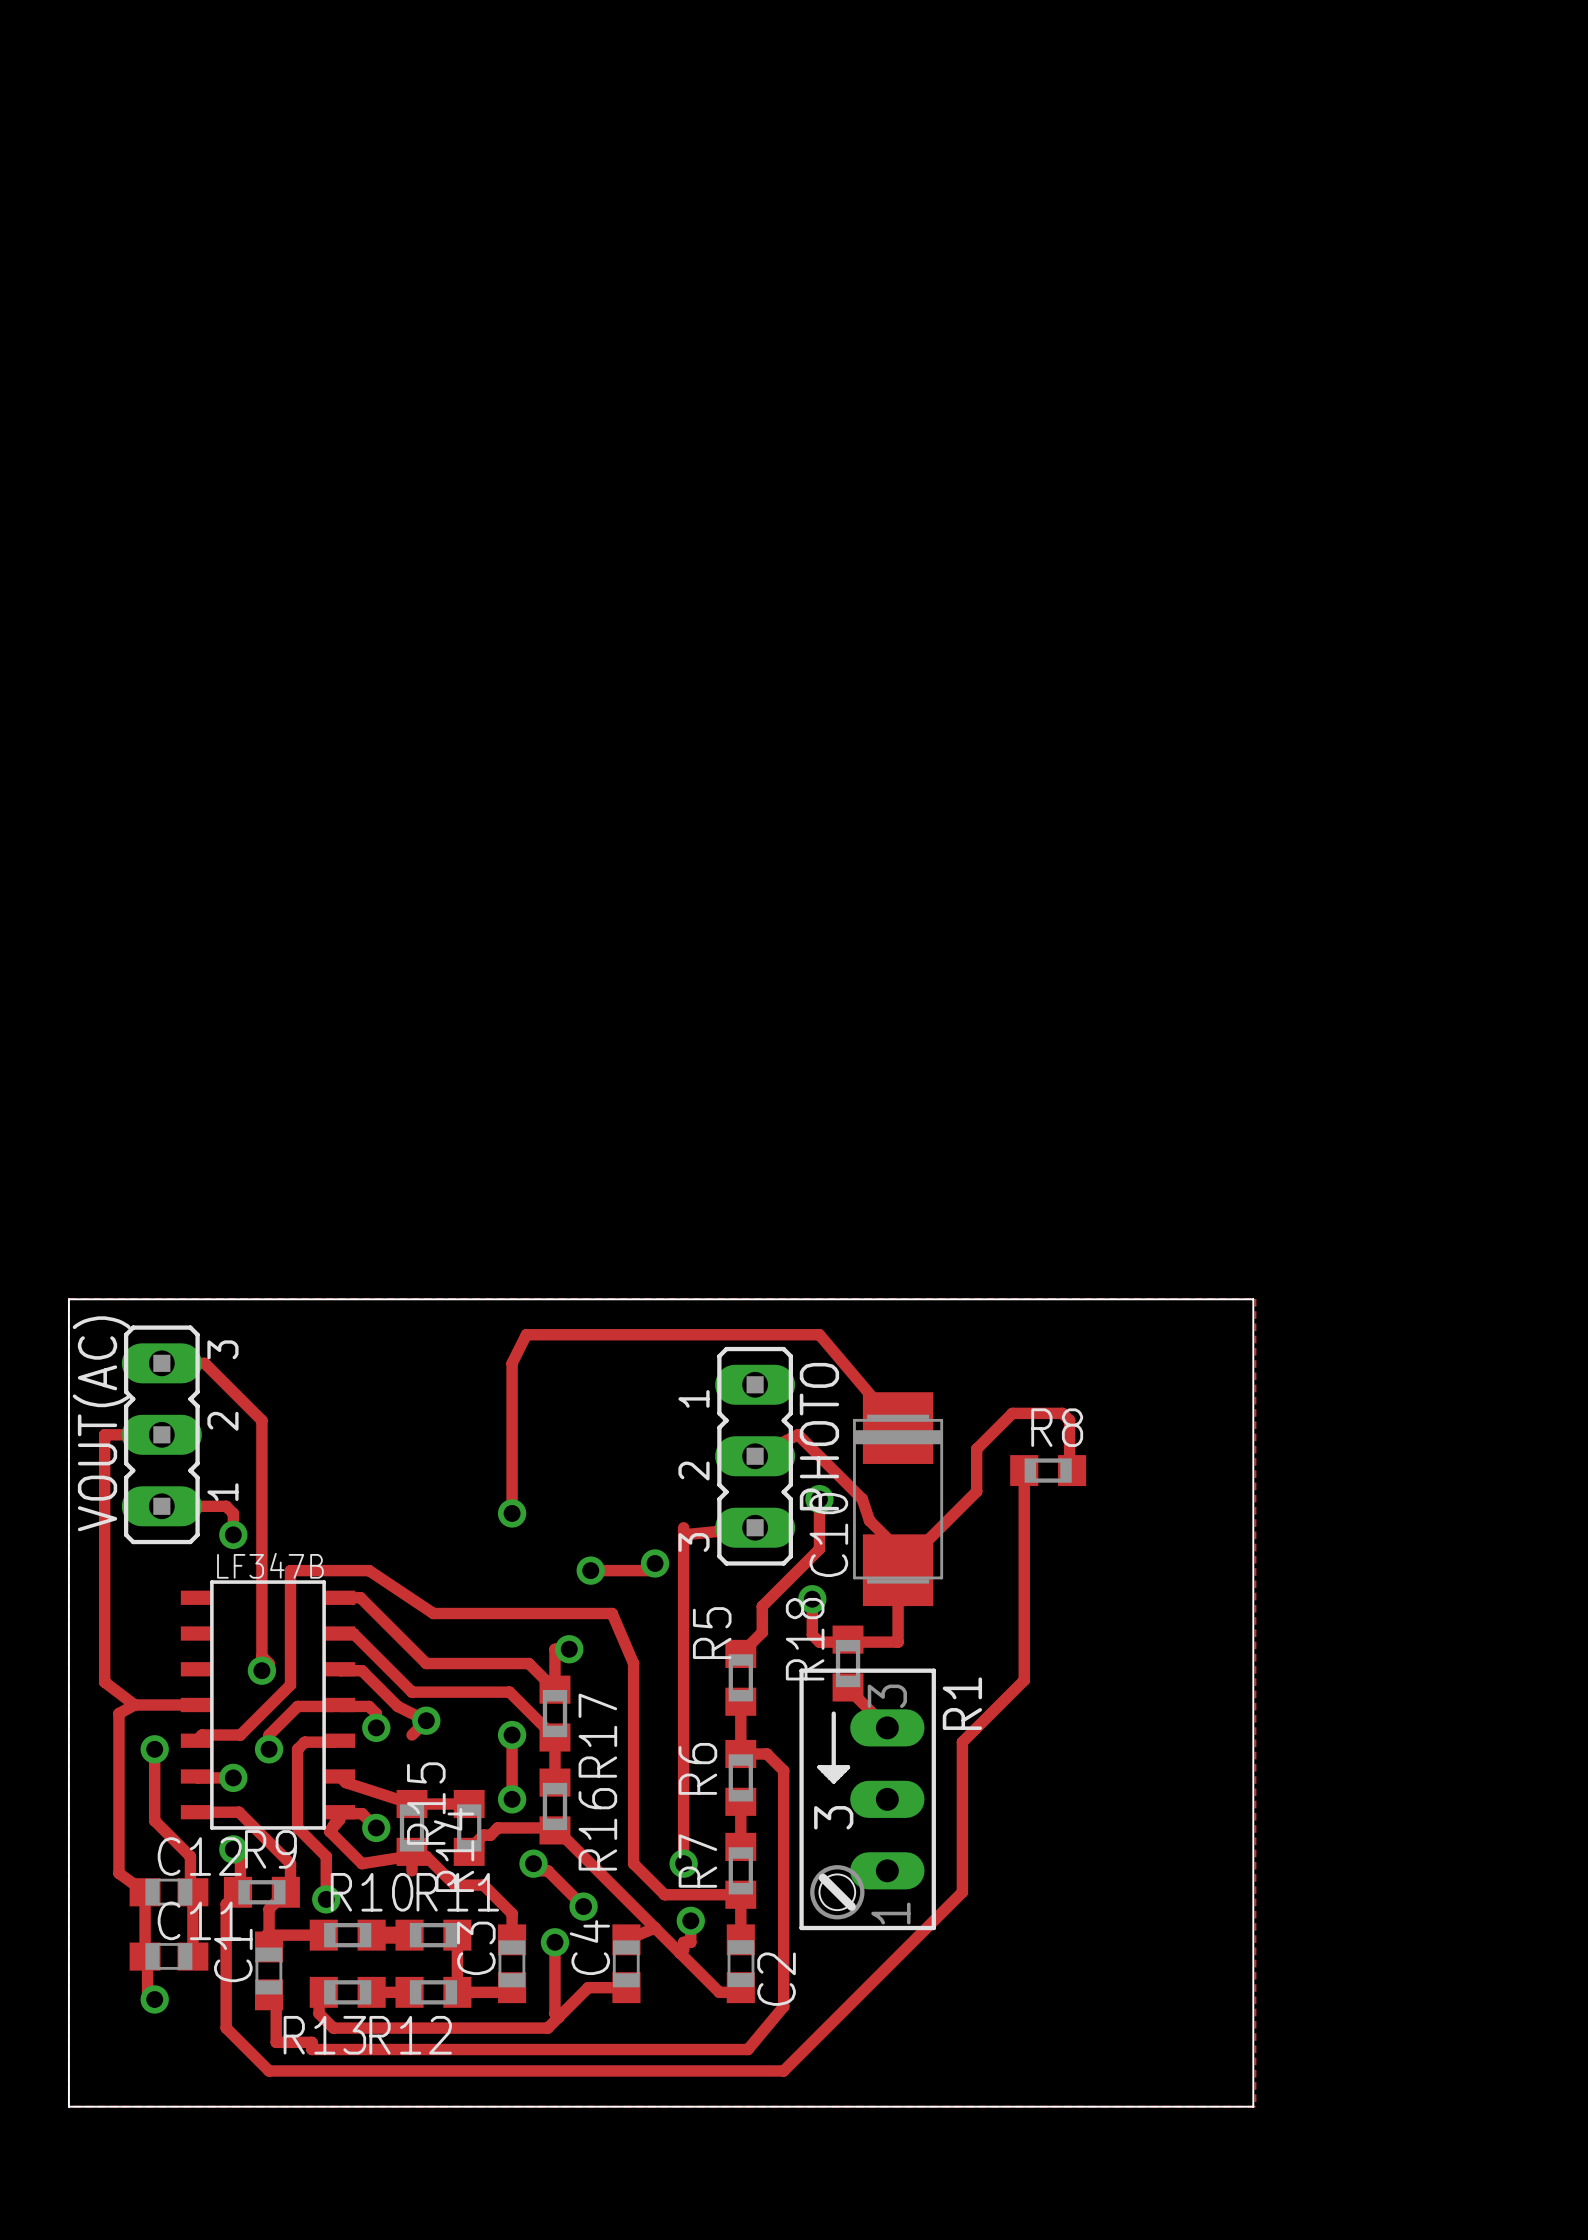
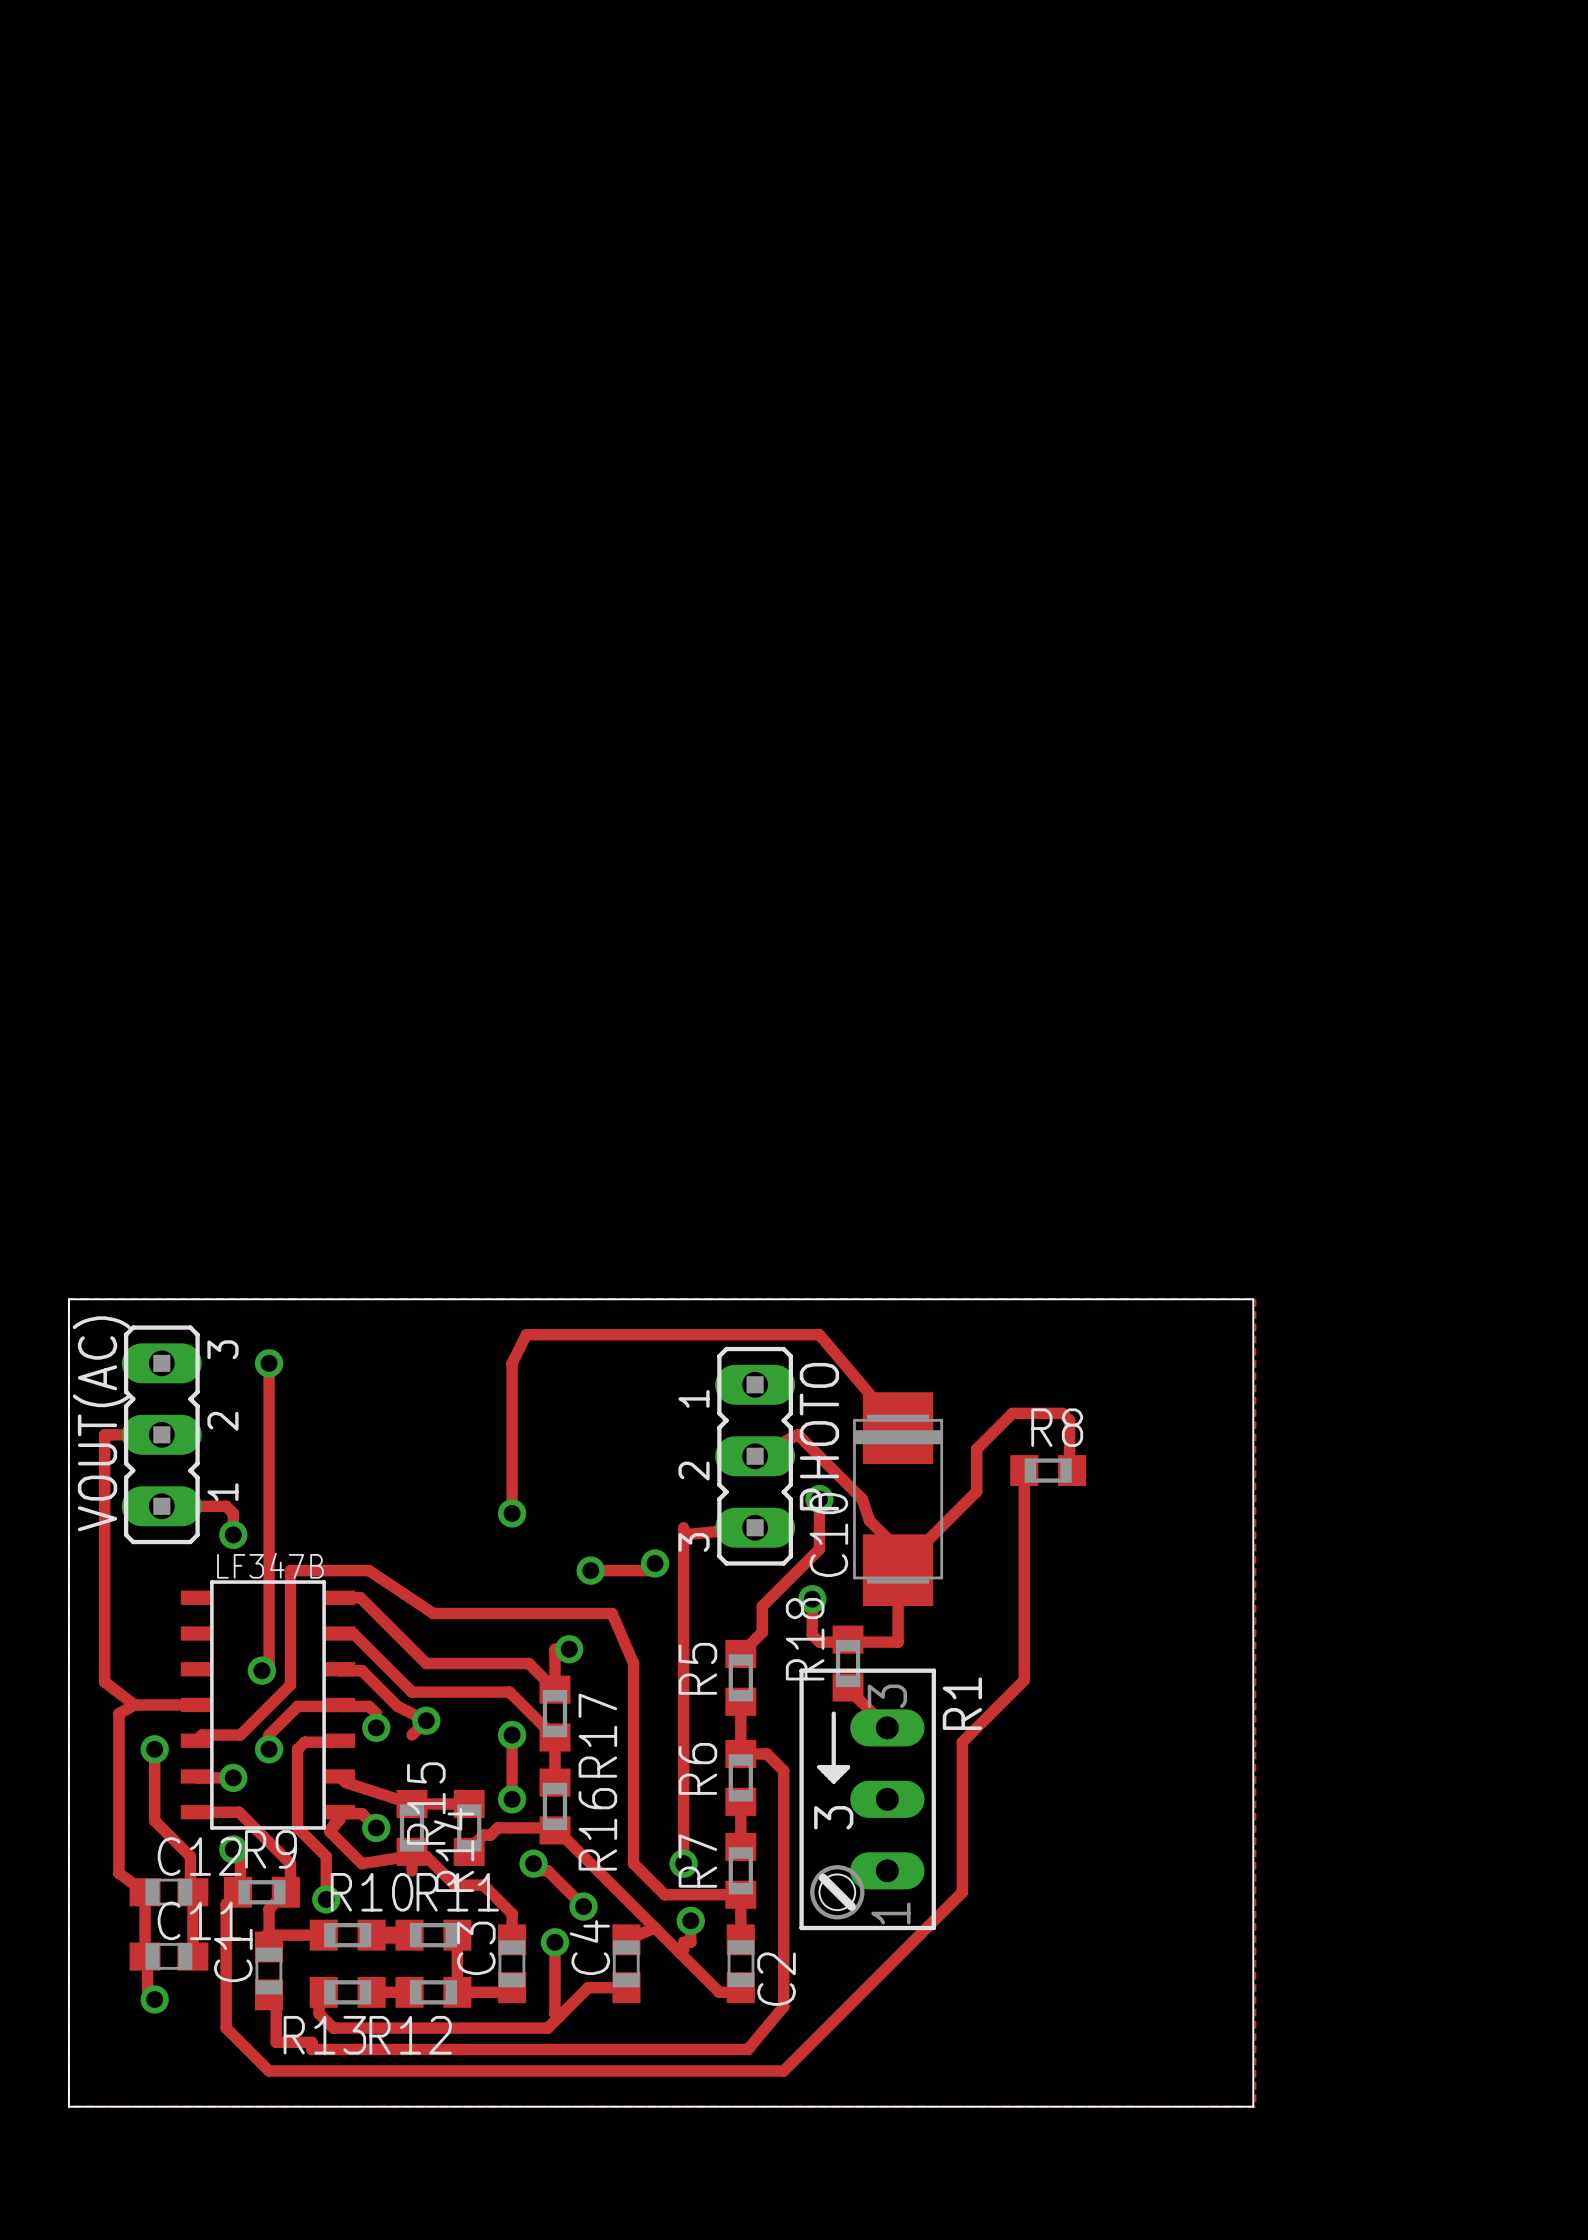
track: (161, 1363) (204, 1363) (261, 1420) (261, 1656) (269, 1663) -> (269, 1363) (269, 1663)
via: none -> (269, 1363)
R5 name position: R5 (712, 1633) -> R5 (697, 1668)

